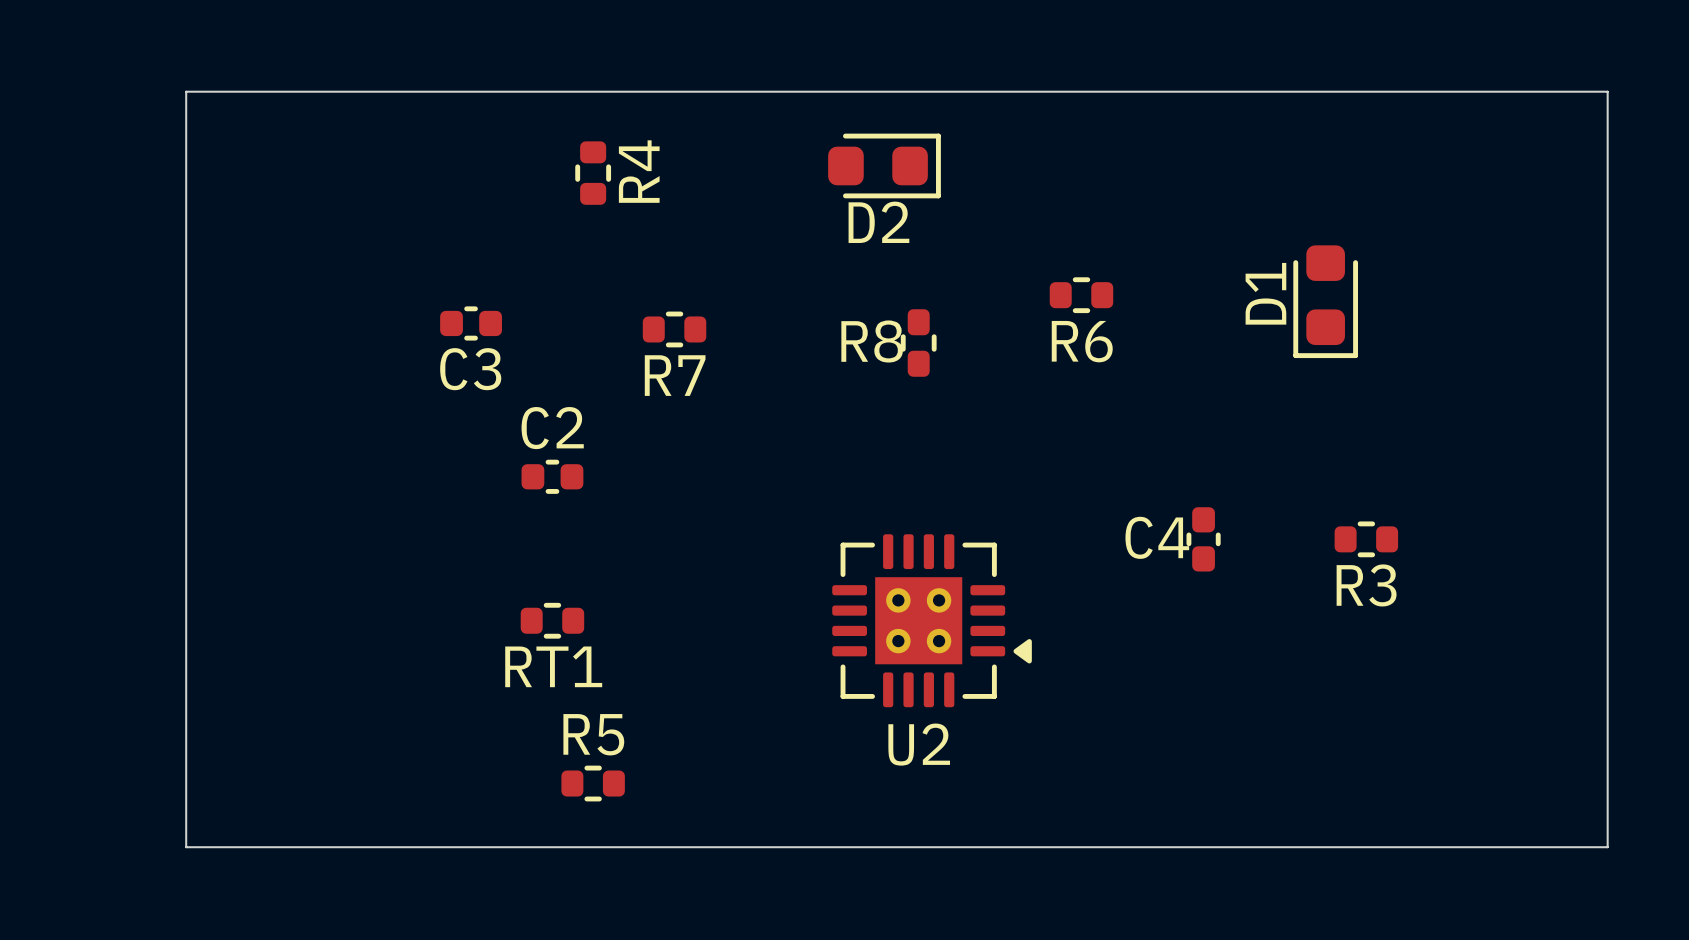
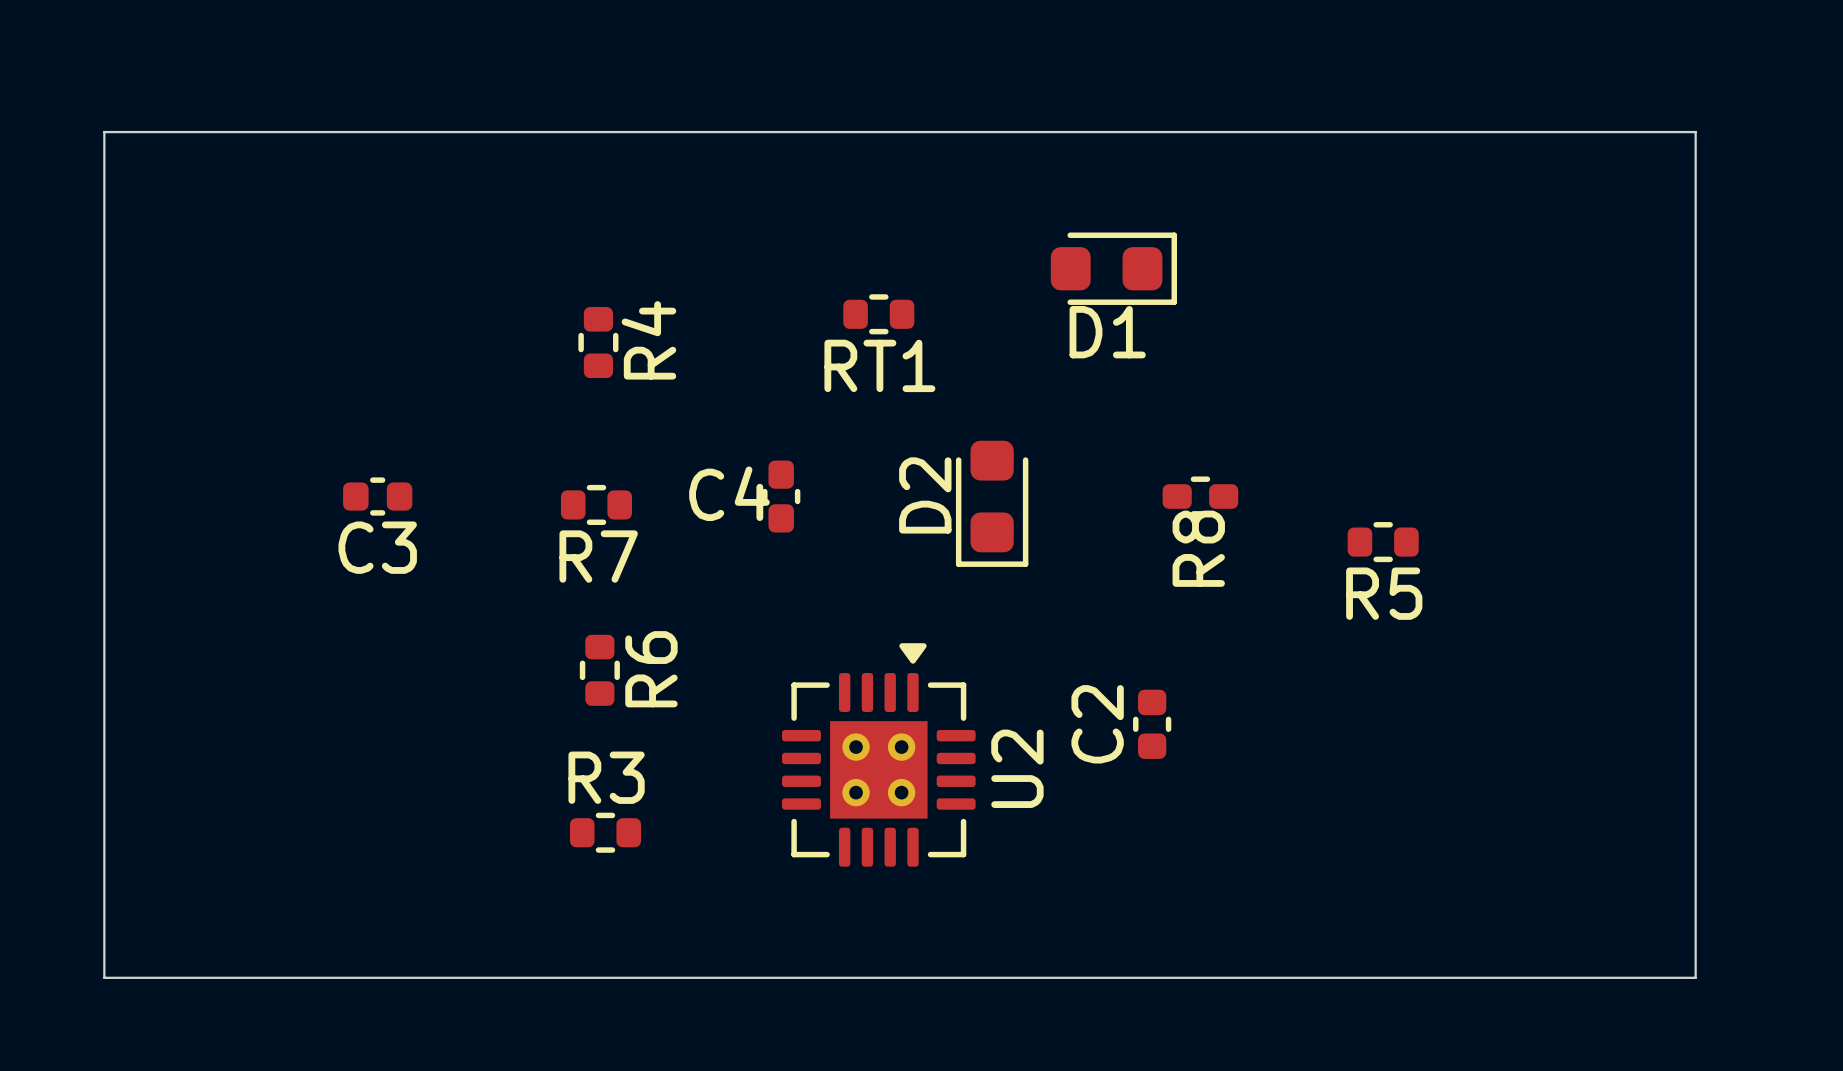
D2 rotation: 0° (884, 165) -> 90° clockwise (992, 503)
D2 position: (884, 165) -> (992, 503)
R4 position: (593, 173) -> (598, 342)
R6 rotation: 0° (1081, 295) -> 90° clockwise (599, 670)
R6 position: (1081, 295) -> (599, 670)
D1 rotation: 0° (1325, 301) -> 90° counterclockwise (1113, 268)
D1 position: (1325, 301) -> (1113, 268)
C3 position: (471, 323) -> (377, 496)
R7 position: (674, 329) -> (596, 504)
R8 rotation: 0° (918, 343) -> 90° clockwise (1200, 496)
R8 position: (918, 343) -> (1200, 496)
C2 rotation: 0° (552, 476) -> 90° clockwise (1152, 724)
C2 position: (552, 476) -> (1152, 724)
C4 position: (1203, 539) -> (781, 496)
R3 position: (1366, 539) -> (605, 832)
R3 name position: R3 (1366, 585) -> R3 (606, 777)
RT1 position: (552, 620) -> (878, 314)
U2 rotation: 0° (932, 620) -> 90° counterclockwise (878, 754)
R5 name position: R5 (593, 734) -> R5 (1384, 593)
R5 position: (593, 783) -> (1383, 542)

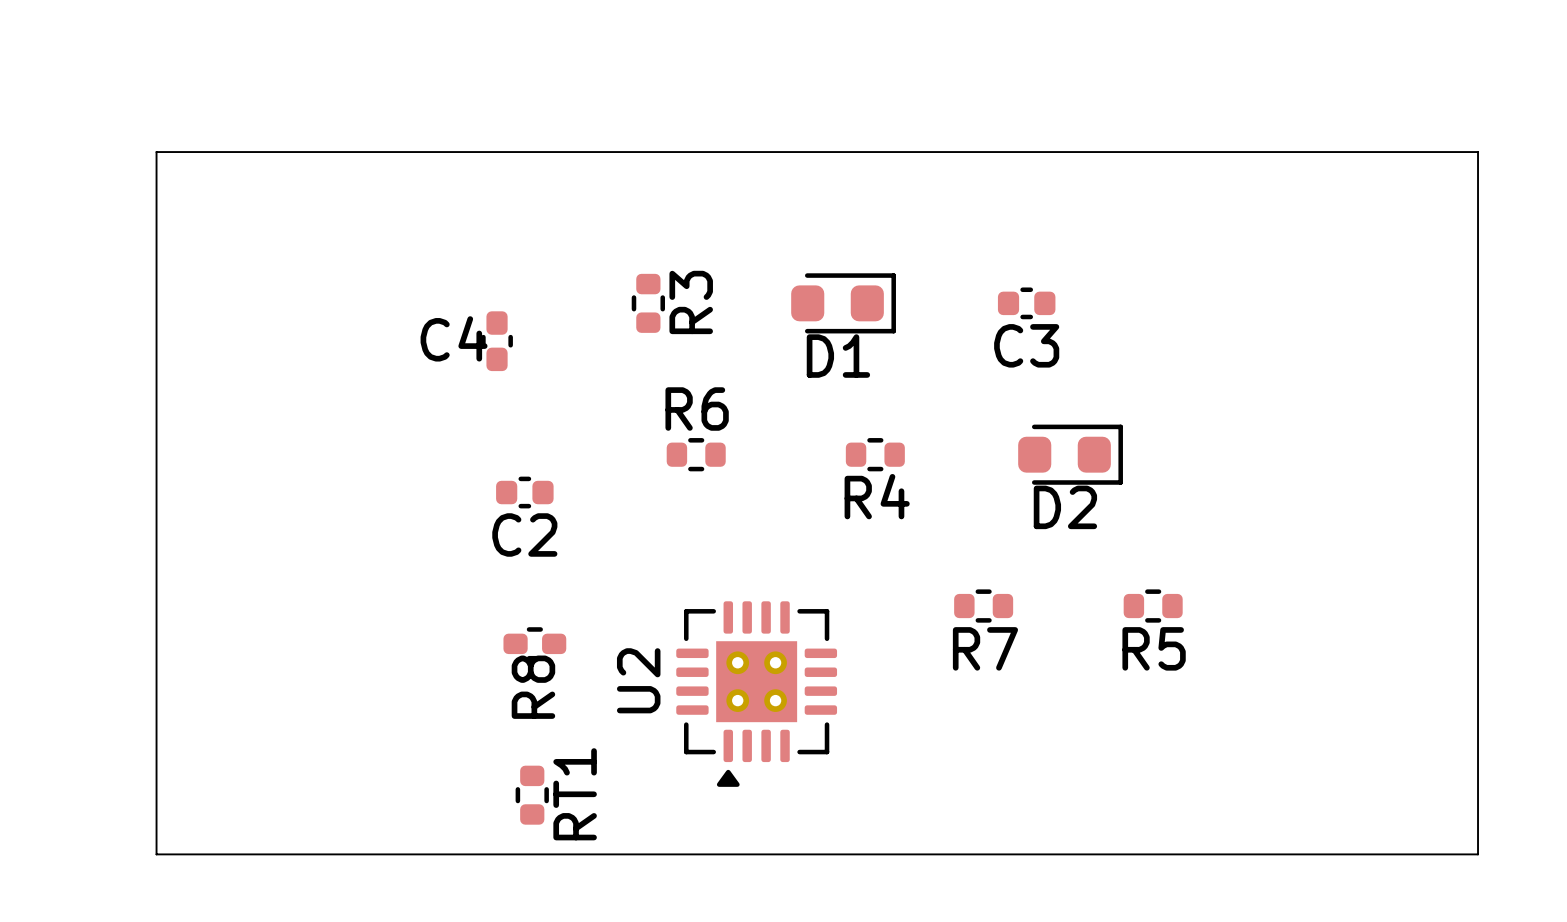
D1 position: (1113, 268) -> (843, 303)
RT1 rotation: 0° (878, 314) -> 90° clockwise (532, 795)
RT1 position: (878, 314) -> (532, 795)
R4 rotation: 0° (598, 342) -> 90° clockwise (875, 454)
R4 position: (598, 342) -> (875, 454)
C3 position: (377, 496) -> (1026, 303)
C4 position: (781, 496) -> (497, 341)
R8 position: (1200, 496) -> (534, 643)
D2 rotation: 0° (992, 503) -> 90° counterclockwise (1070, 454)
D2 position: (992, 503) -> (1070, 454)
R7 position: (596, 504) -> (983, 606)
R5 position: (1383, 542) -> (1153, 606)
R6 rotation: 0° (599, 670) -> 90° clockwise (696, 454)
R6 position: (599, 670) -> (696, 454)
C2 rotation: 0° (1152, 724) -> 90° clockwise (524, 492)
C2 position: (1152, 724) -> (524, 492)
U2 rotation: 0° (878, 754) -> 180° (756, 694)
R3 rotation: 0° (605, 832) -> 90° clockwise (648, 303)
R3 position: (605, 832) -> (648, 303)

